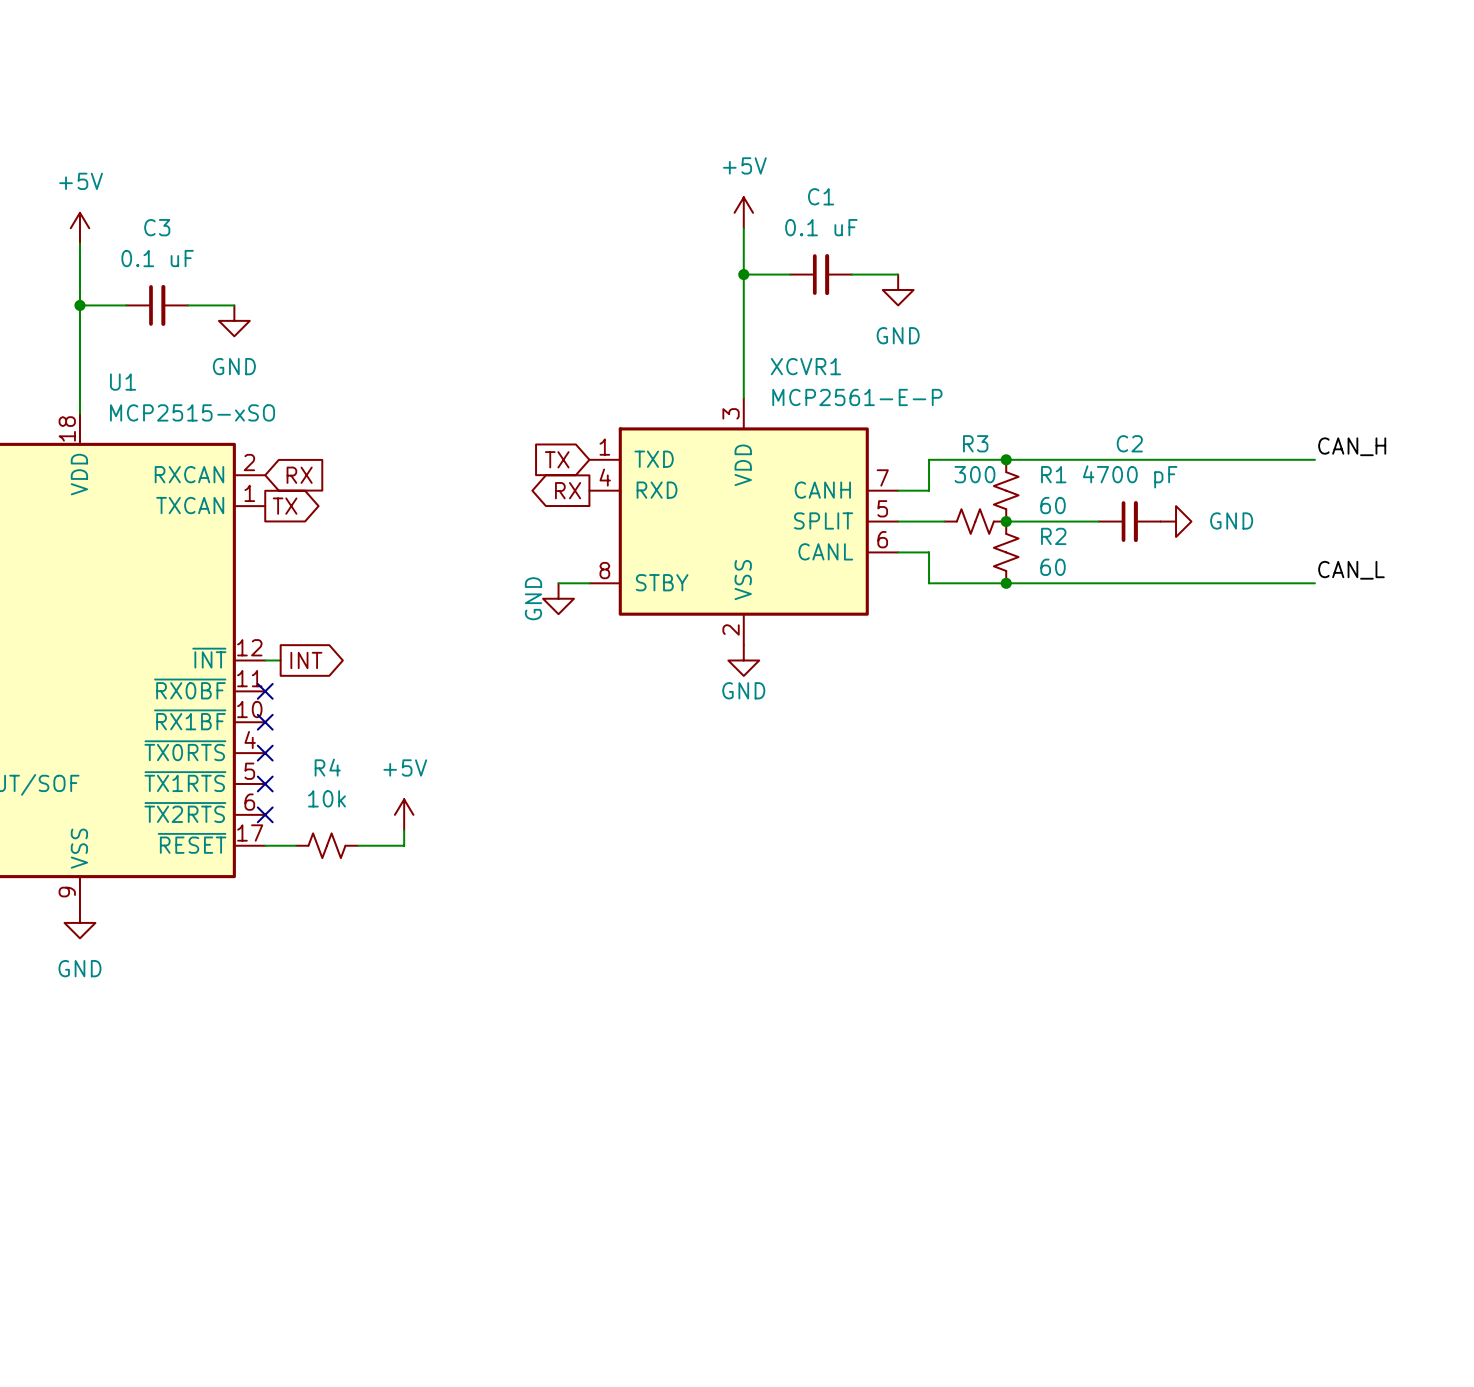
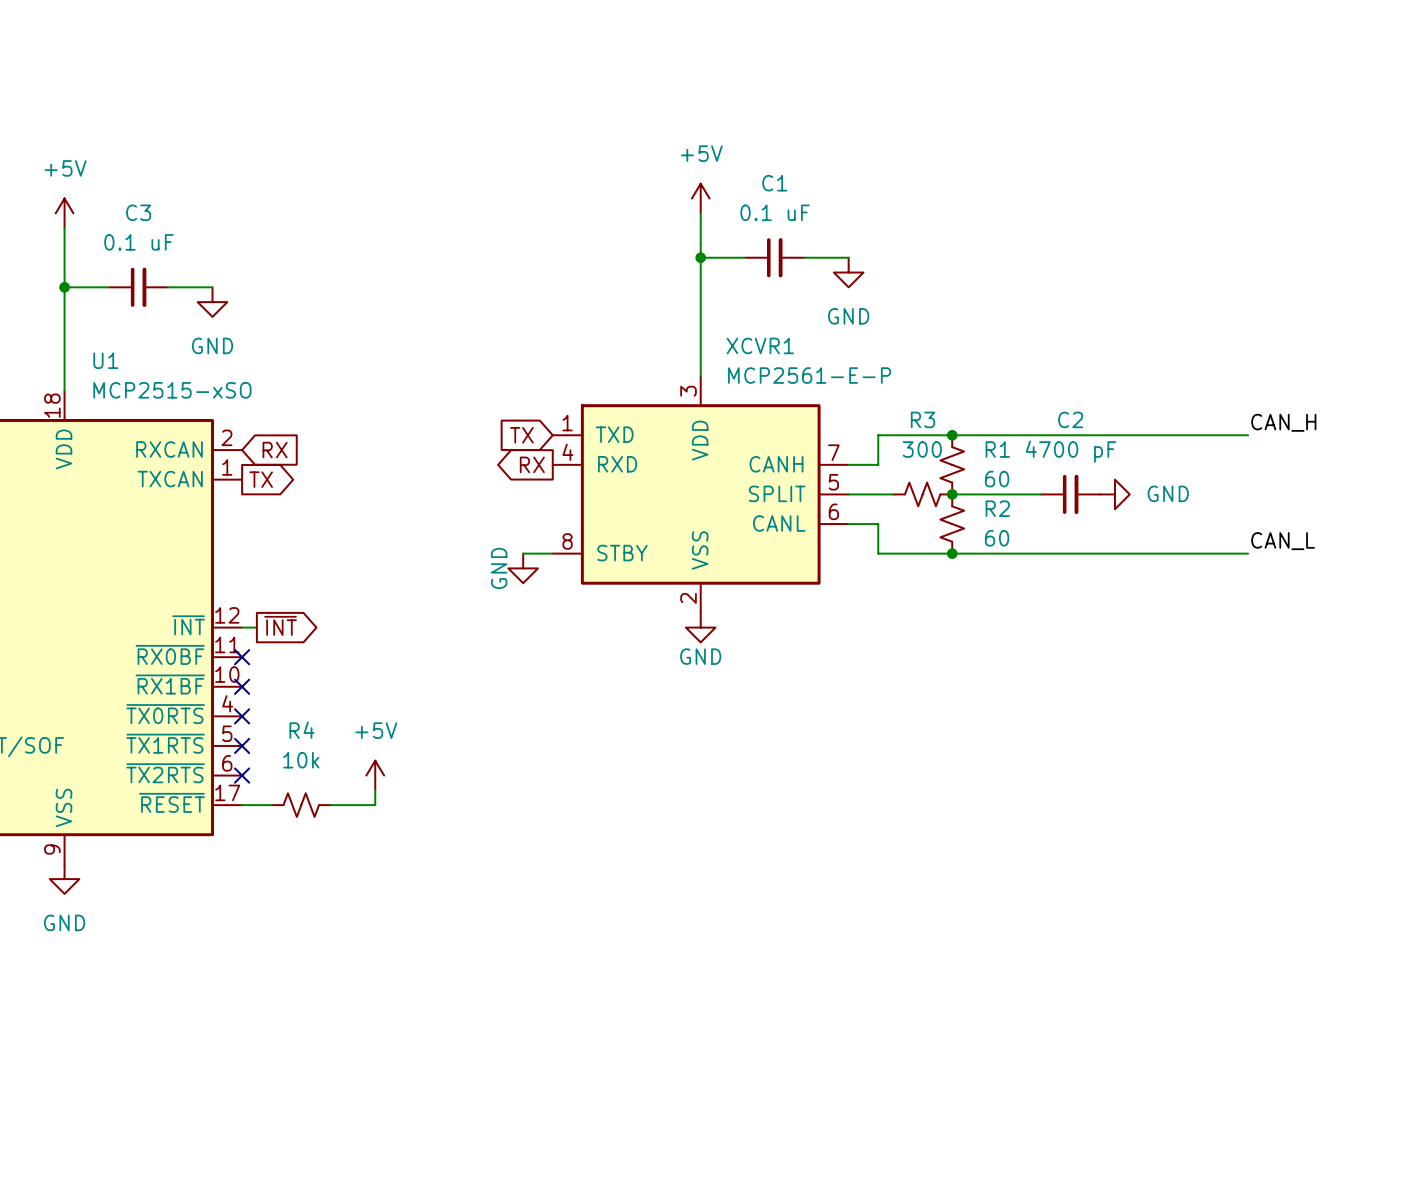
global label: INT (306, 660) -> ~{INT} (280, 625)

